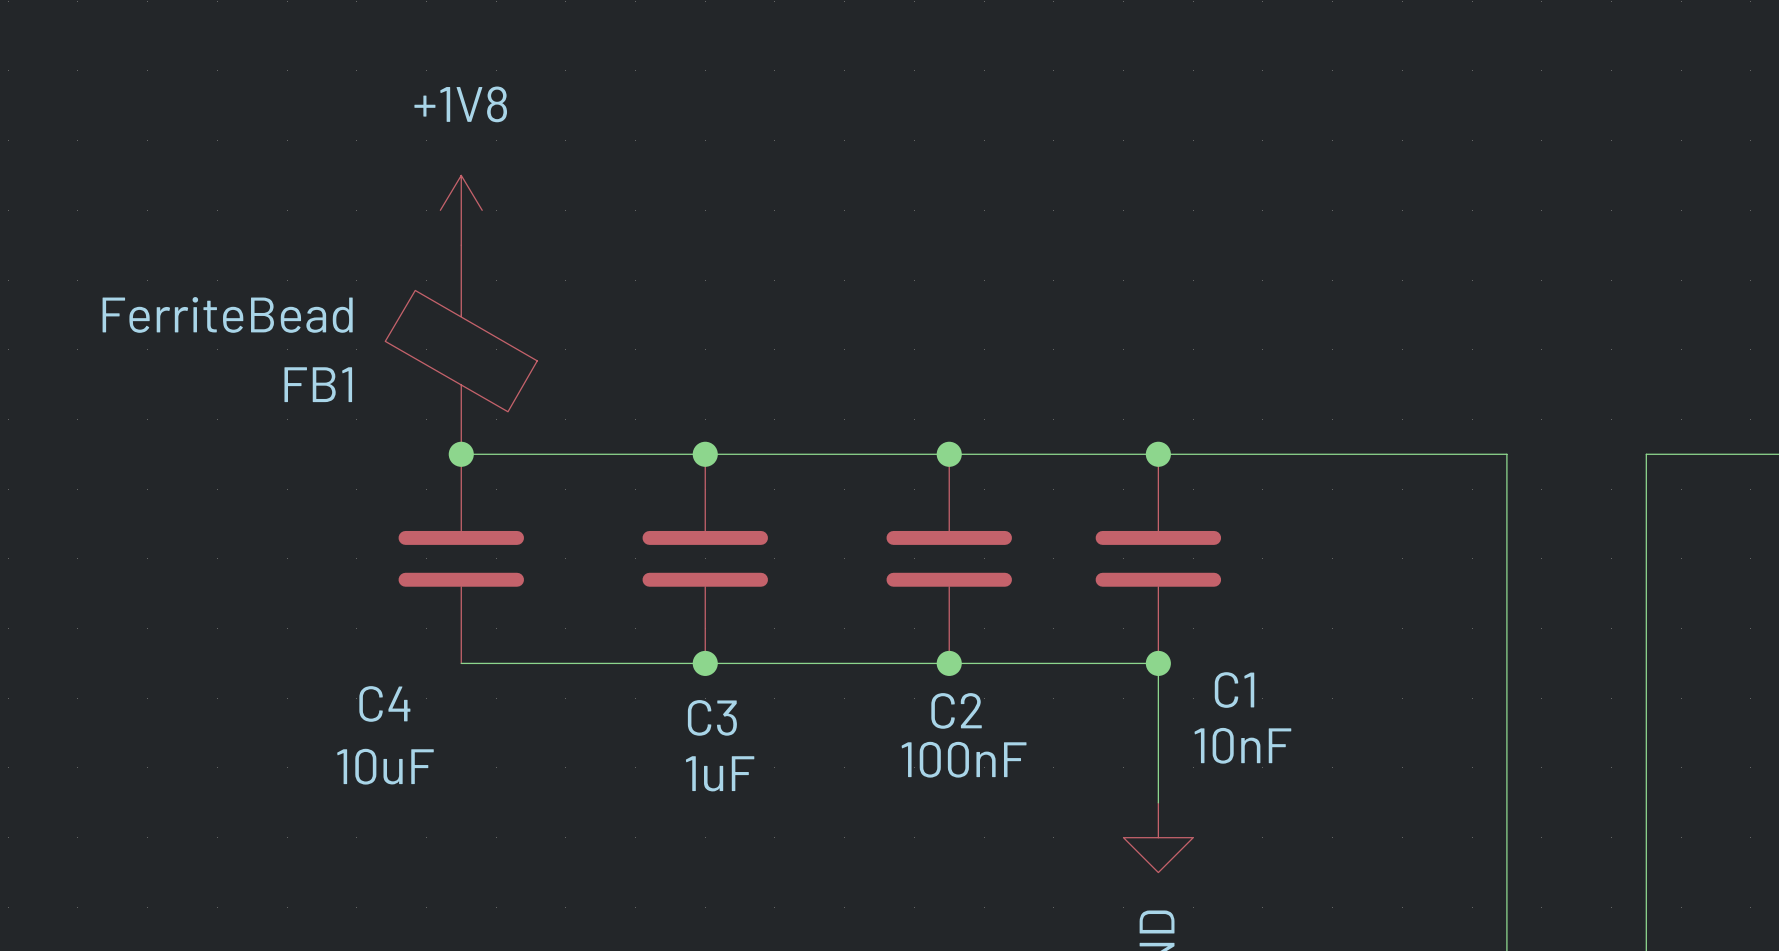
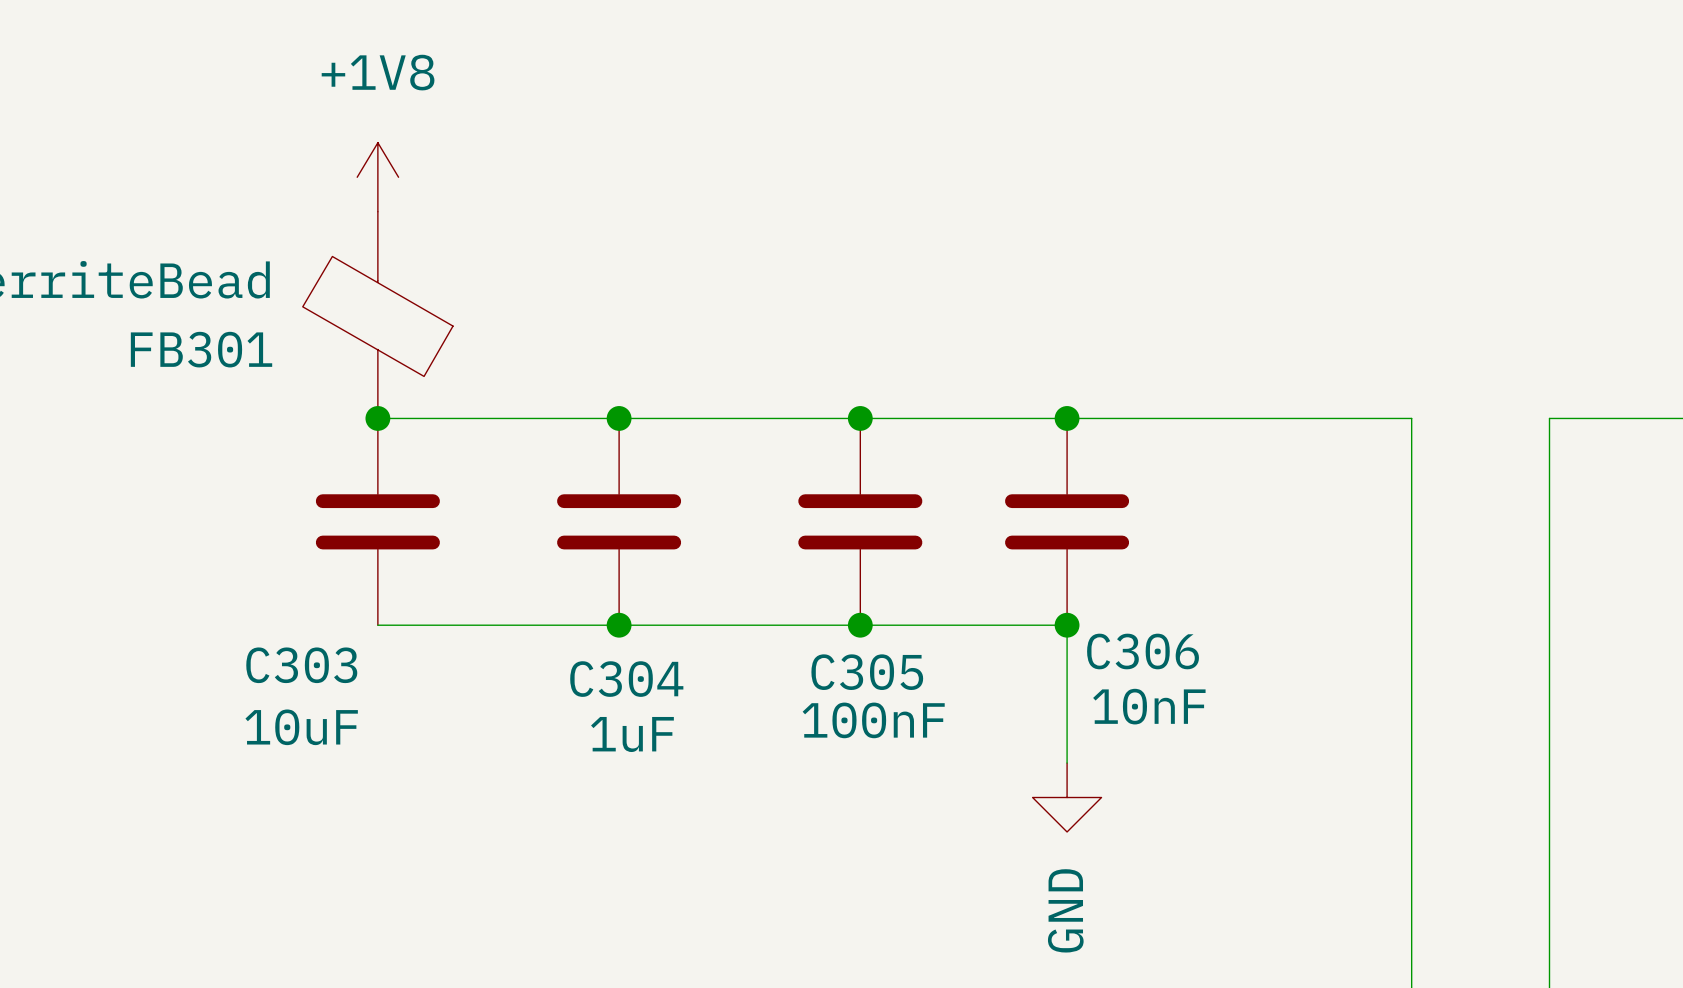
FB1 name: FB1 (318, 384) -> FB301 (201, 349)
C1 name: C1 (1234, 690) -> C306 (1143, 651)
C4 name: C4 (384, 703) -> C303 (301, 665)
C2 name: C2 (956, 710) -> C305 (867, 672)
C3 name: C3 (712, 717) -> C304 (626, 679)

